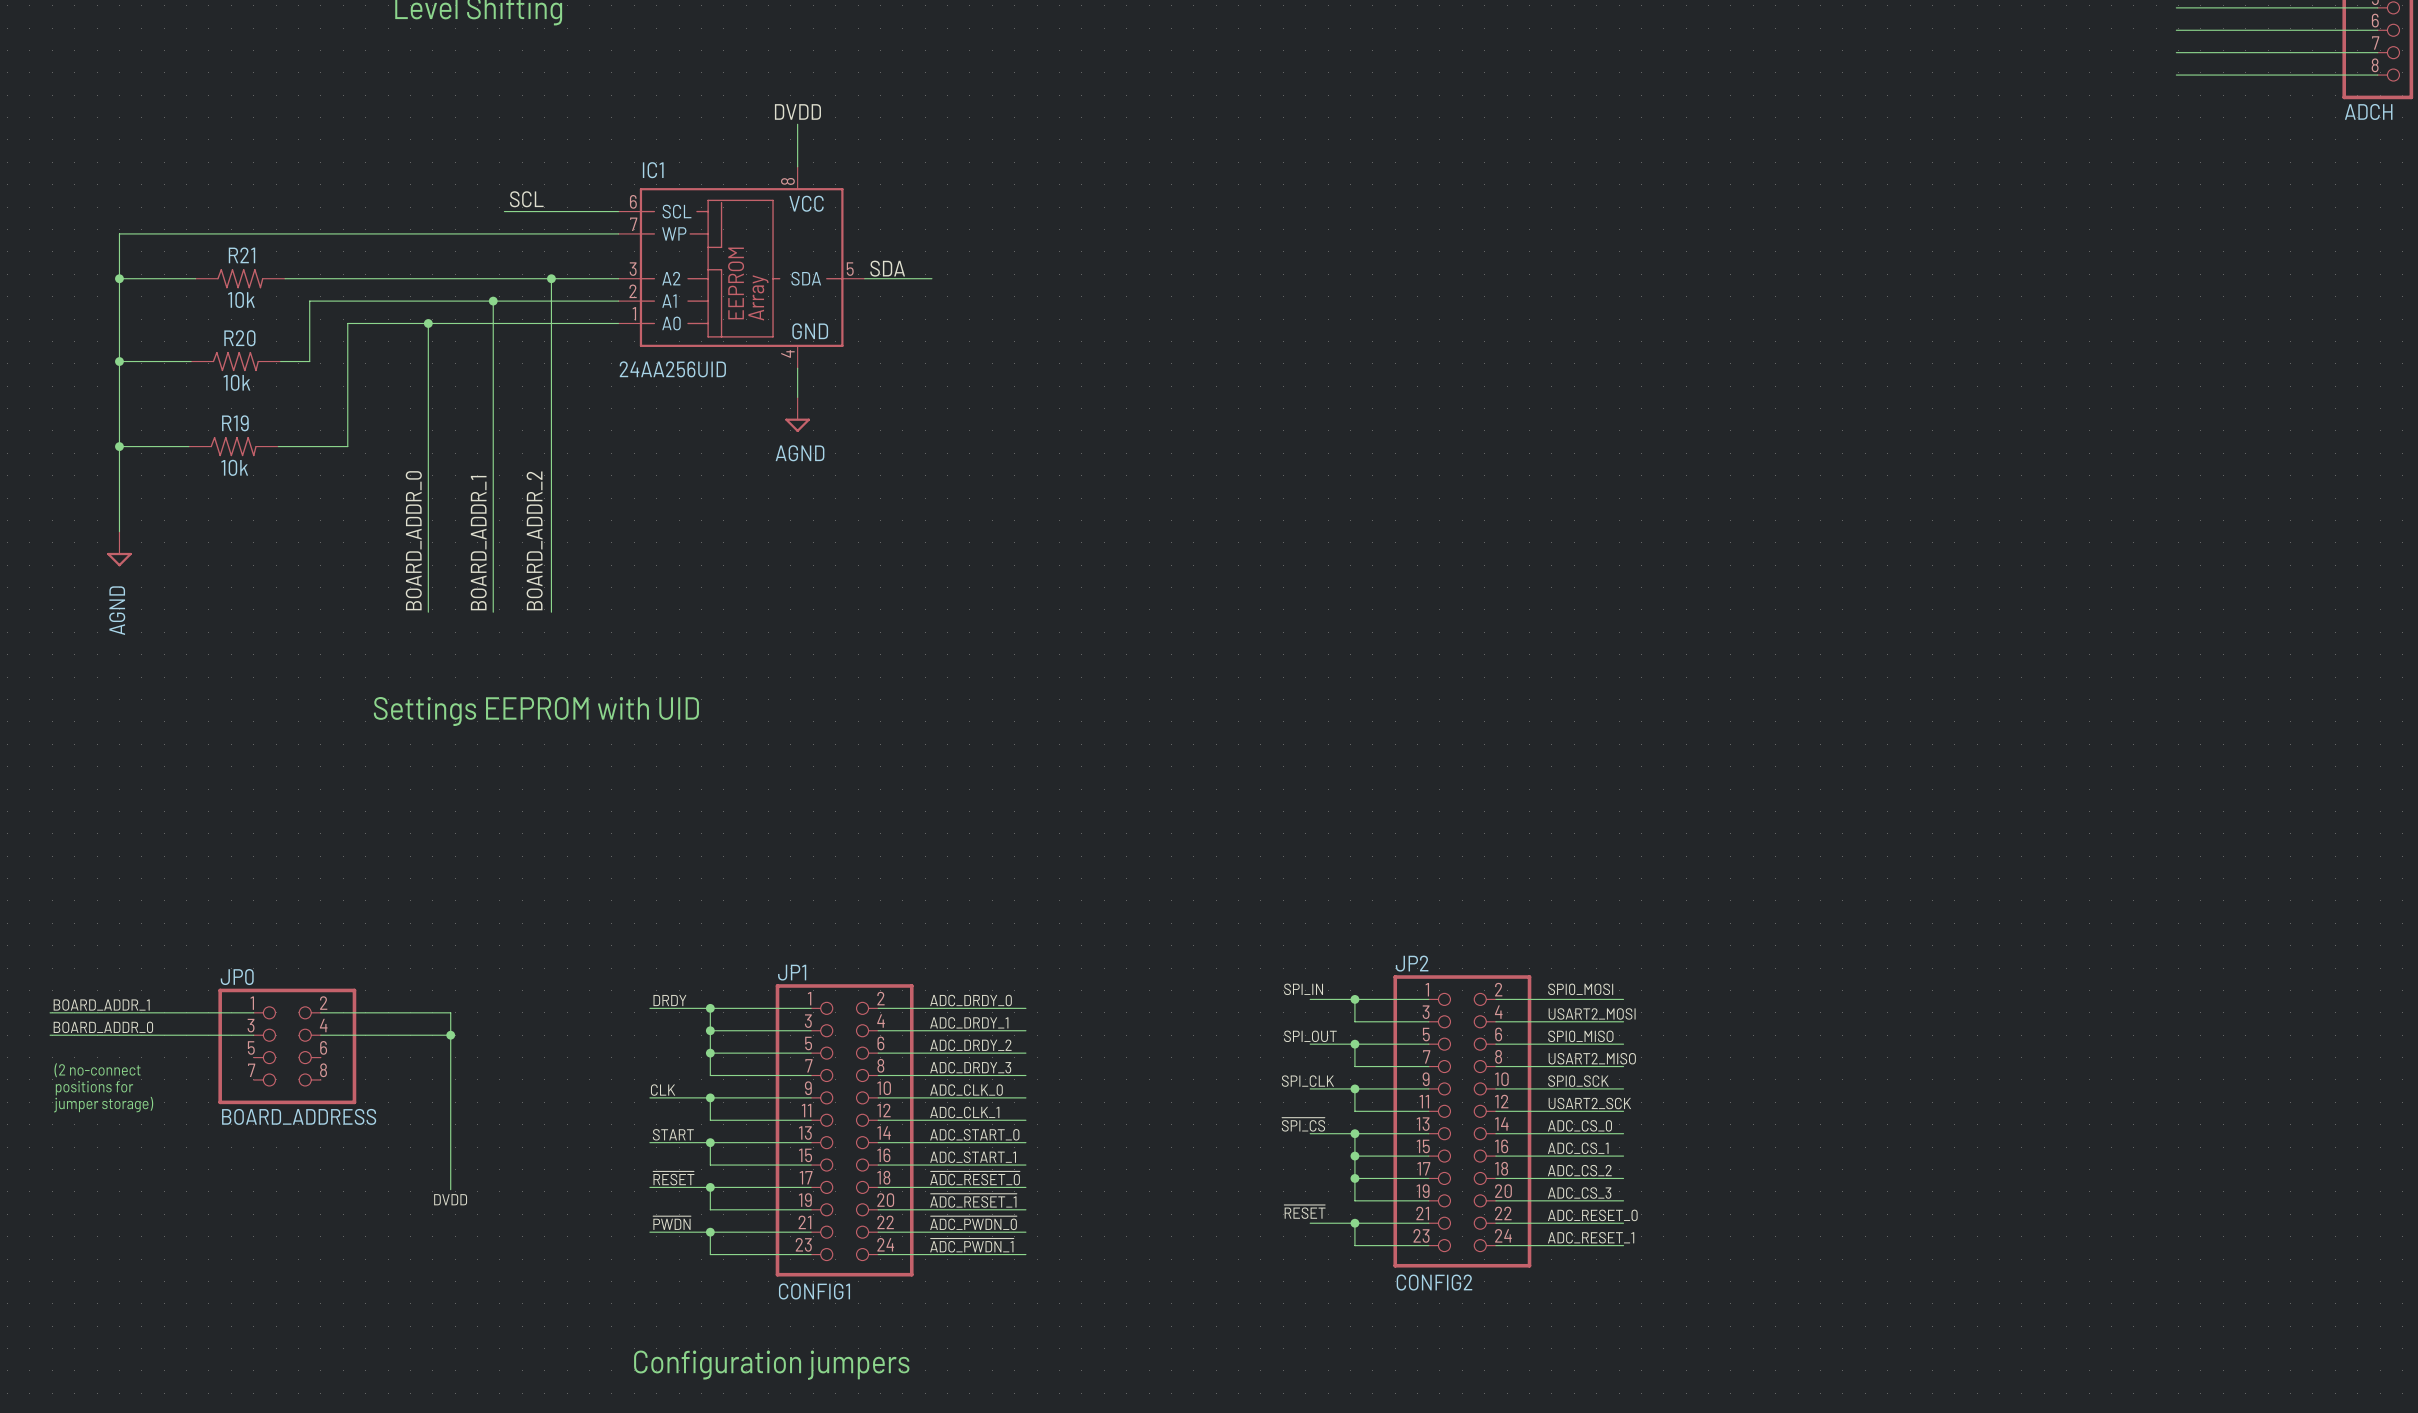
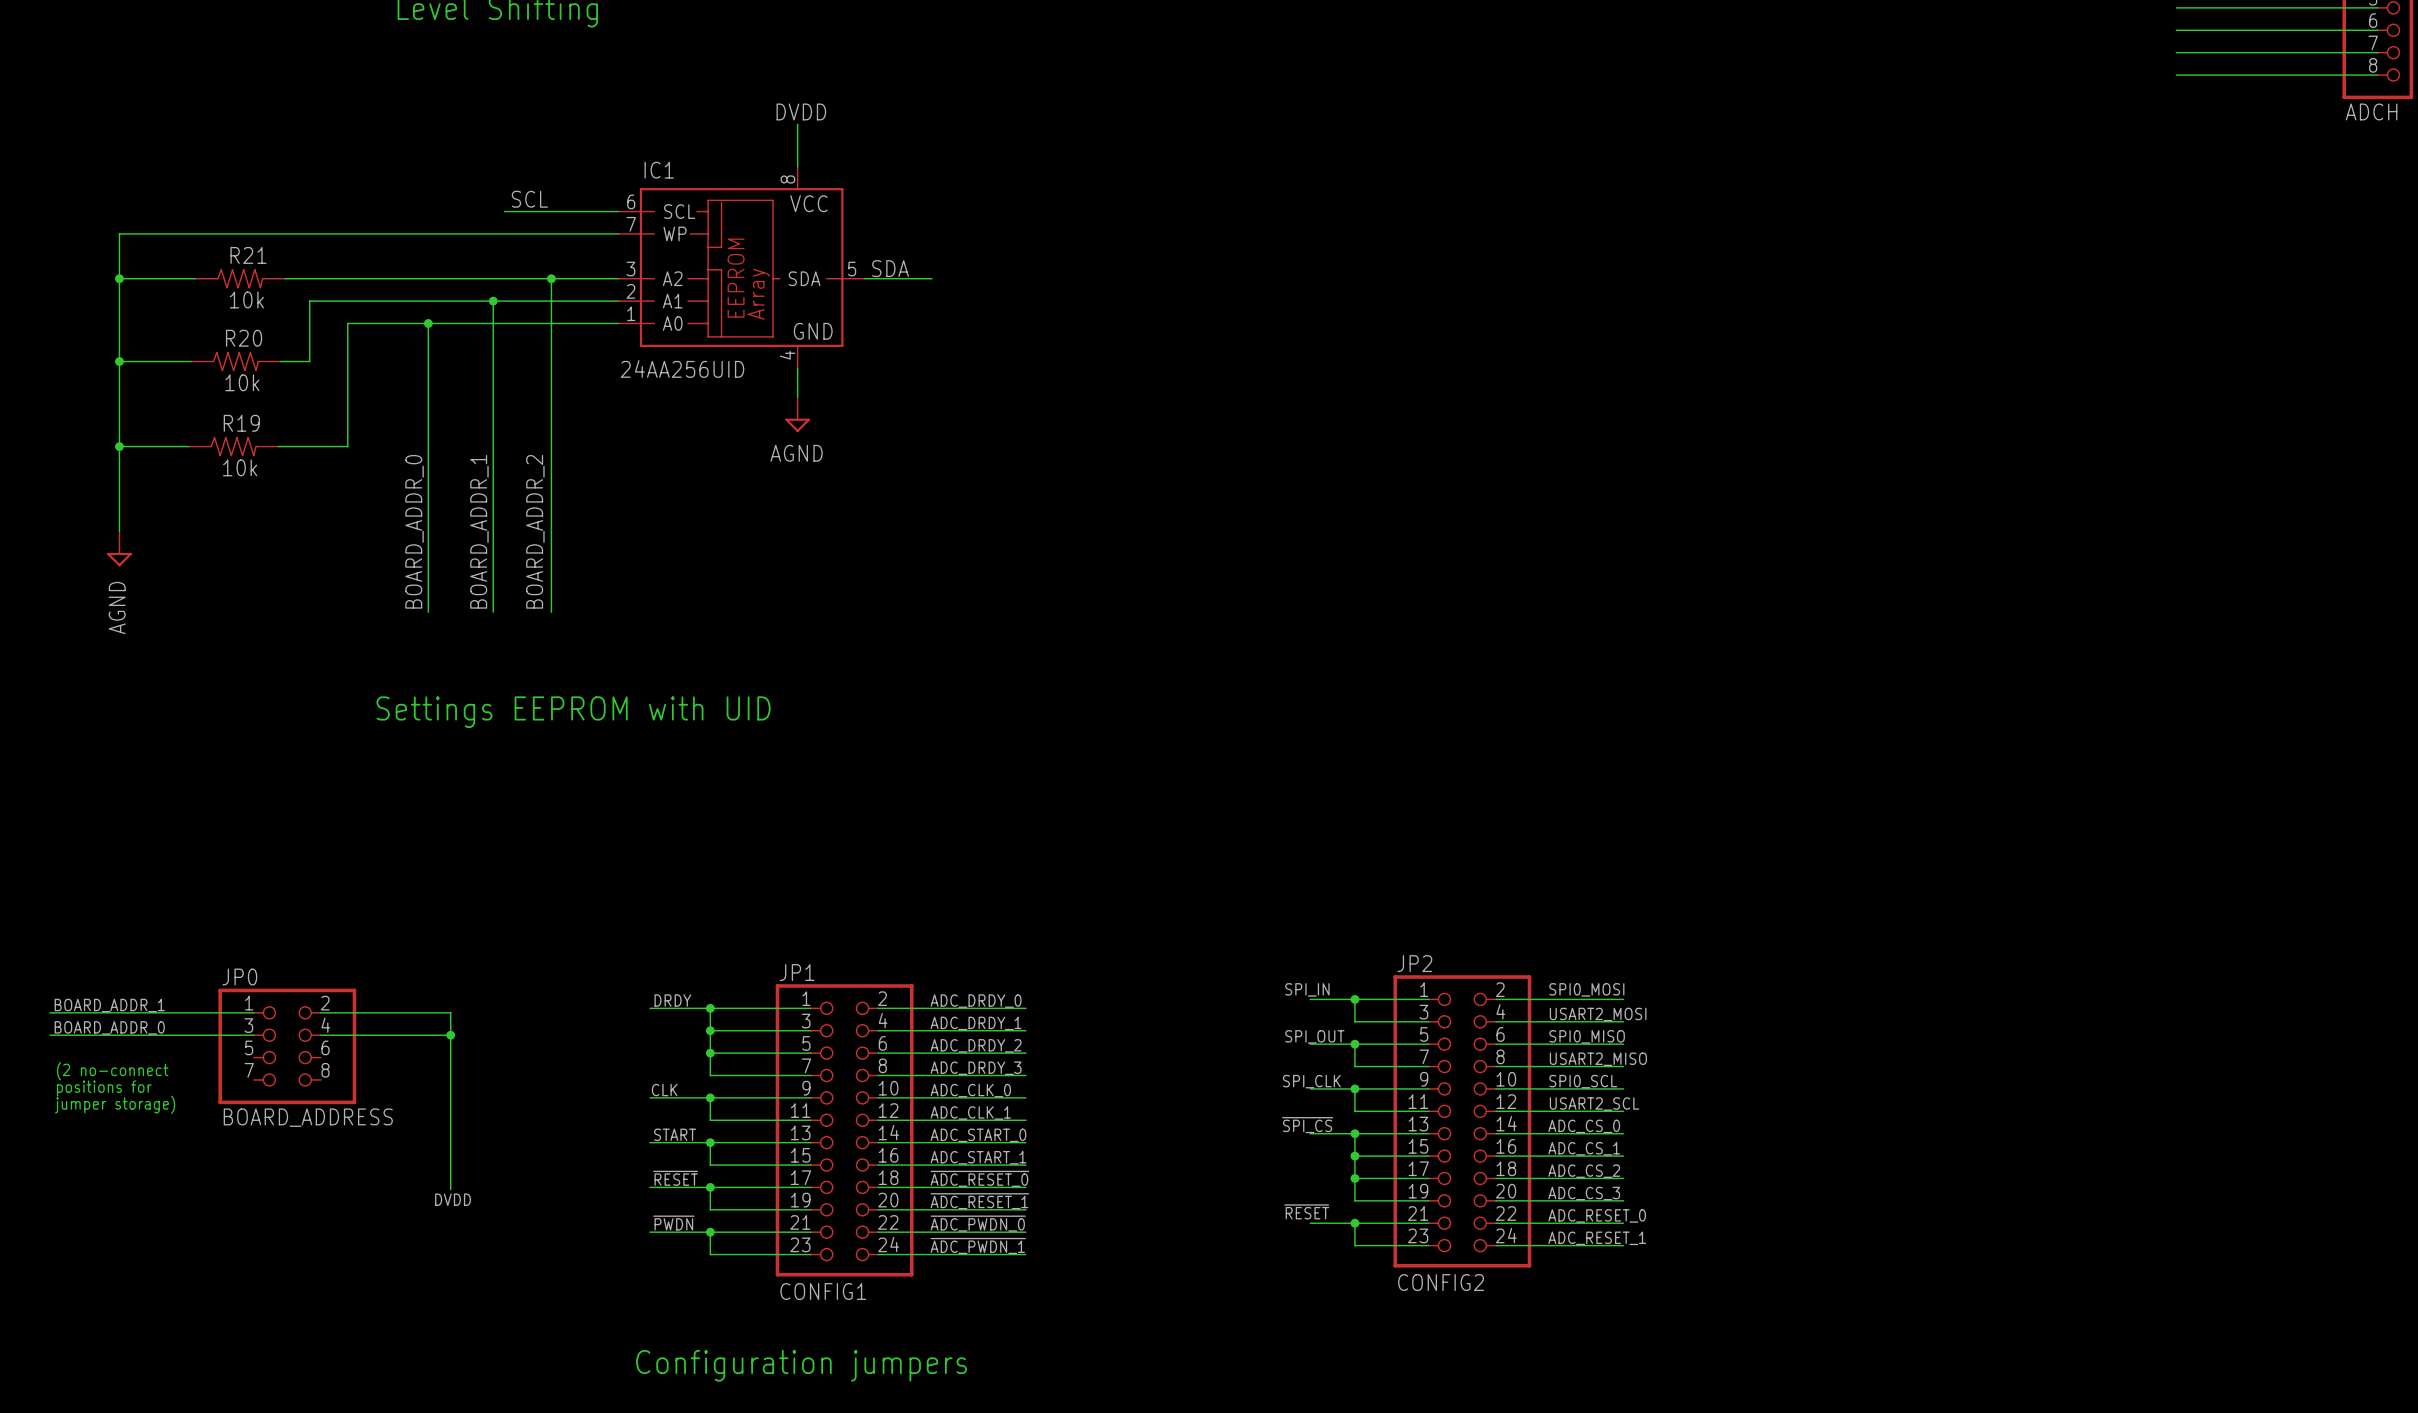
label: SPI0_SCK (1578, 1081) -> SPI0_SCL (1583, 1081)
label: USART2_SCK (1589, 1103) -> USART2_SCL (1594, 1104)

